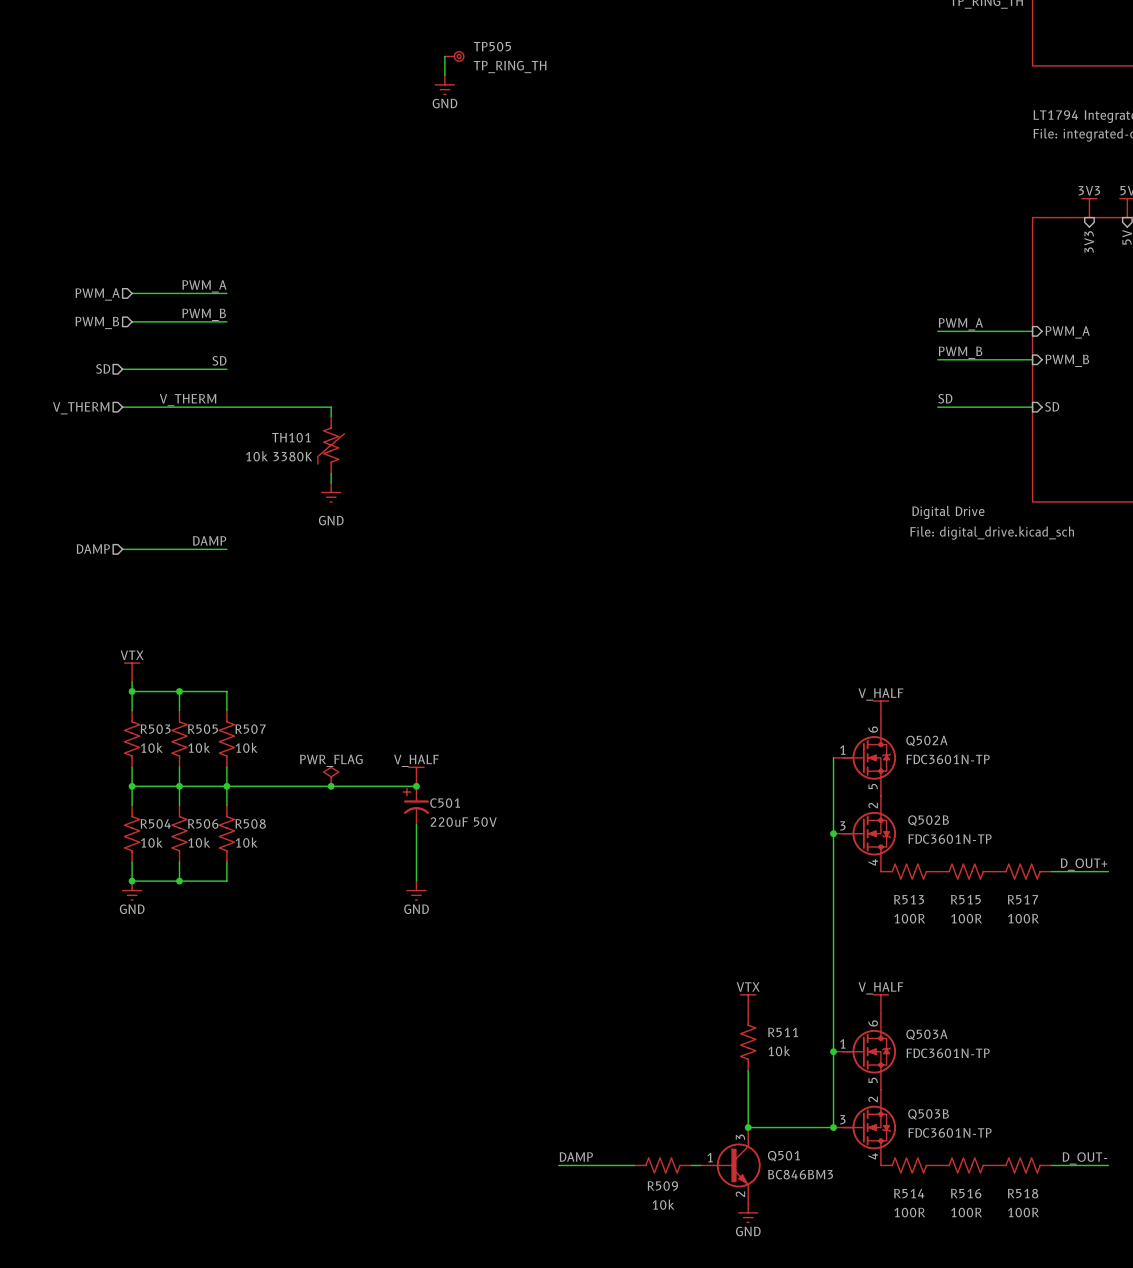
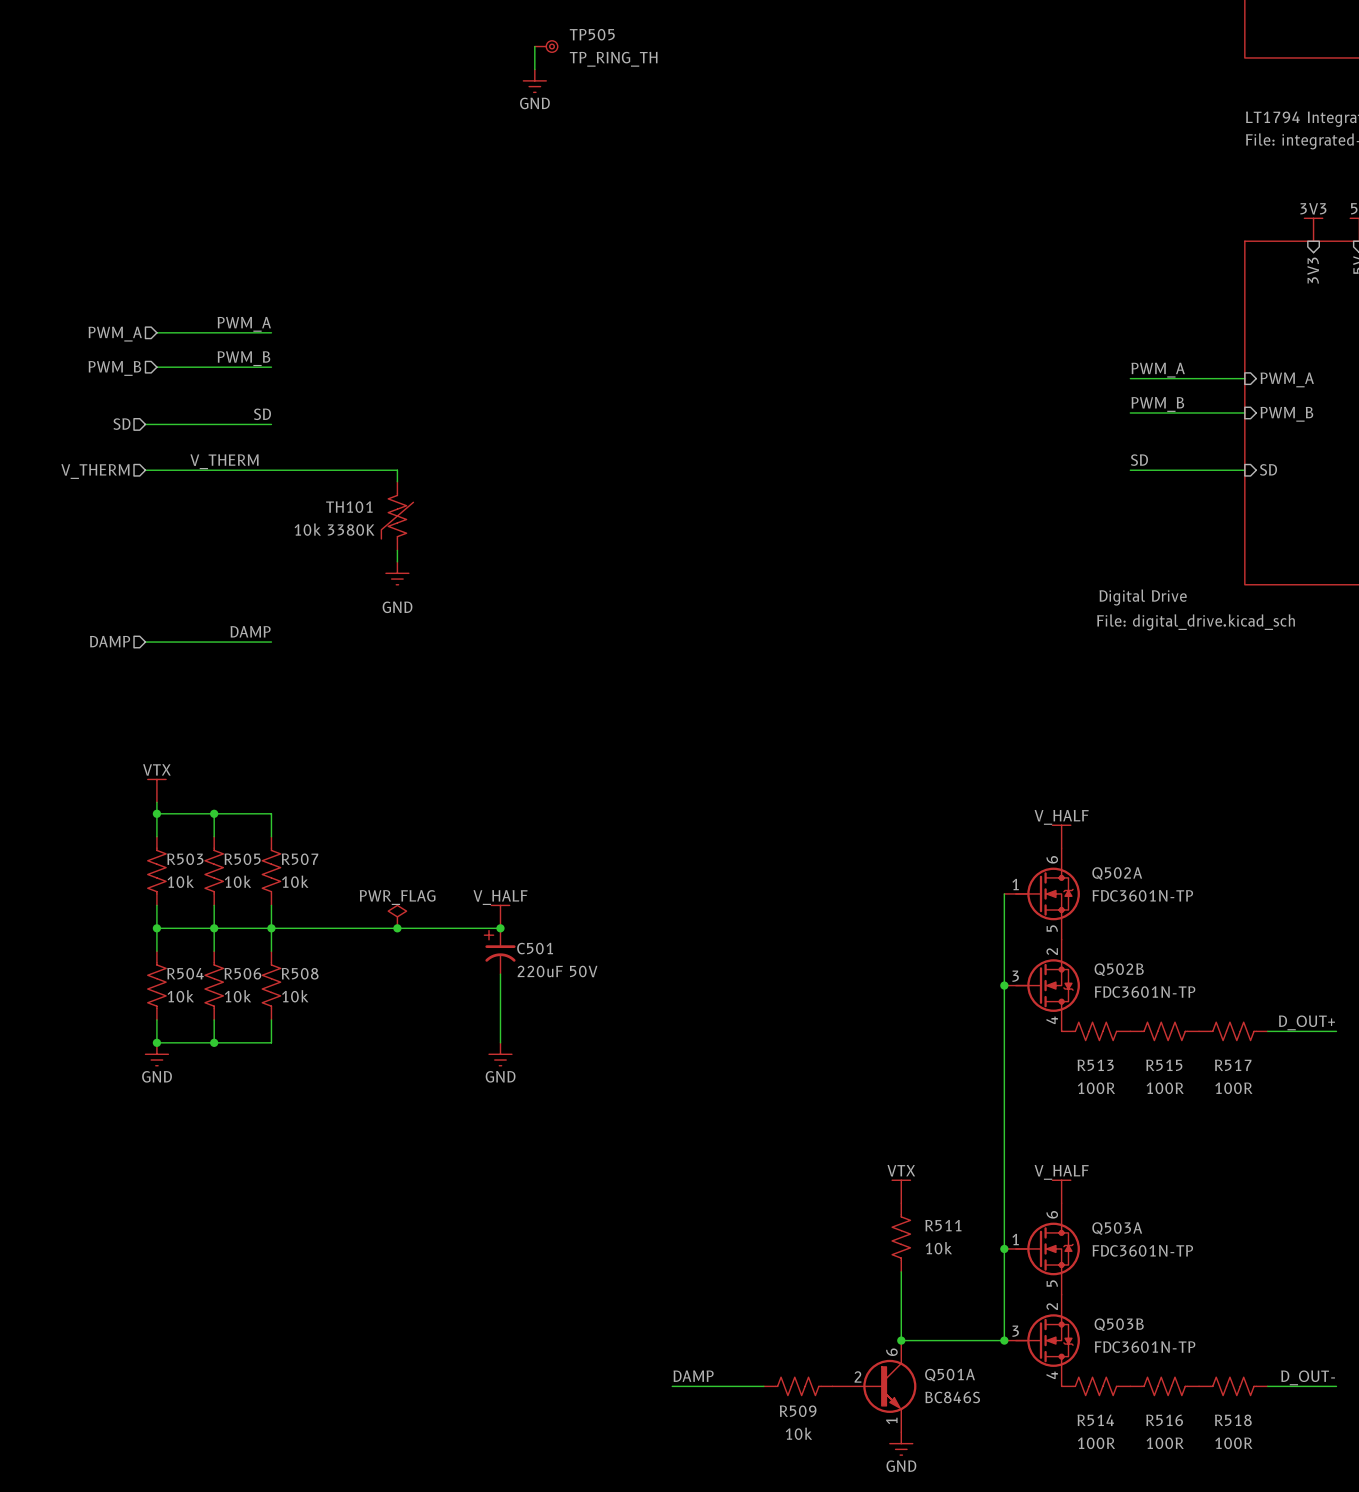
Q501A: none -> BC846S (874, 1386)
Q501: BC846BM3 (730, 1165) -> none

